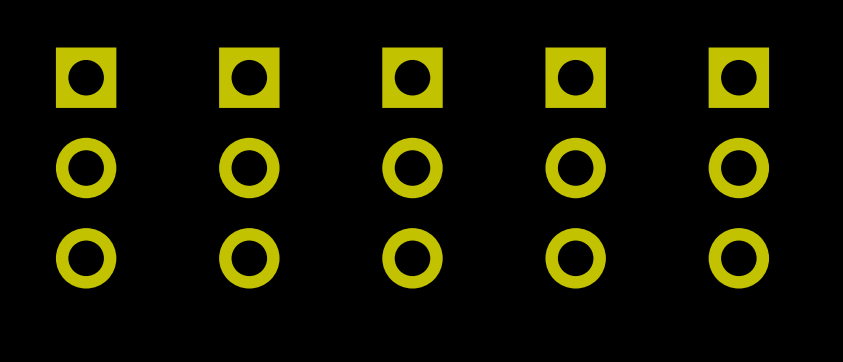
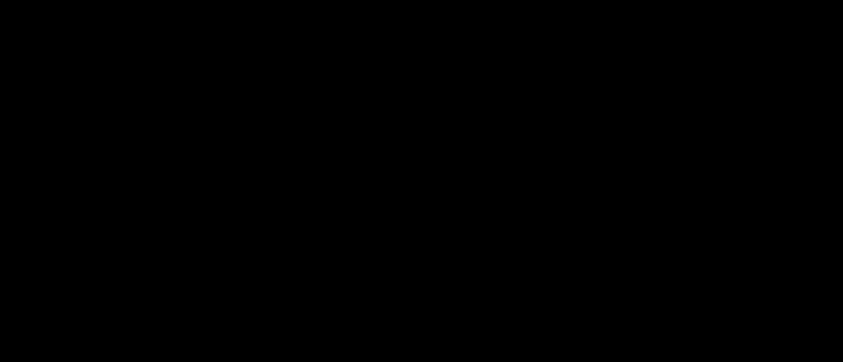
part: (86, 168) -> none
part: (249, 168) -> none
part: (412, 168) -> none
part: (575, 168) -> none
part: (738, 168) -> none

